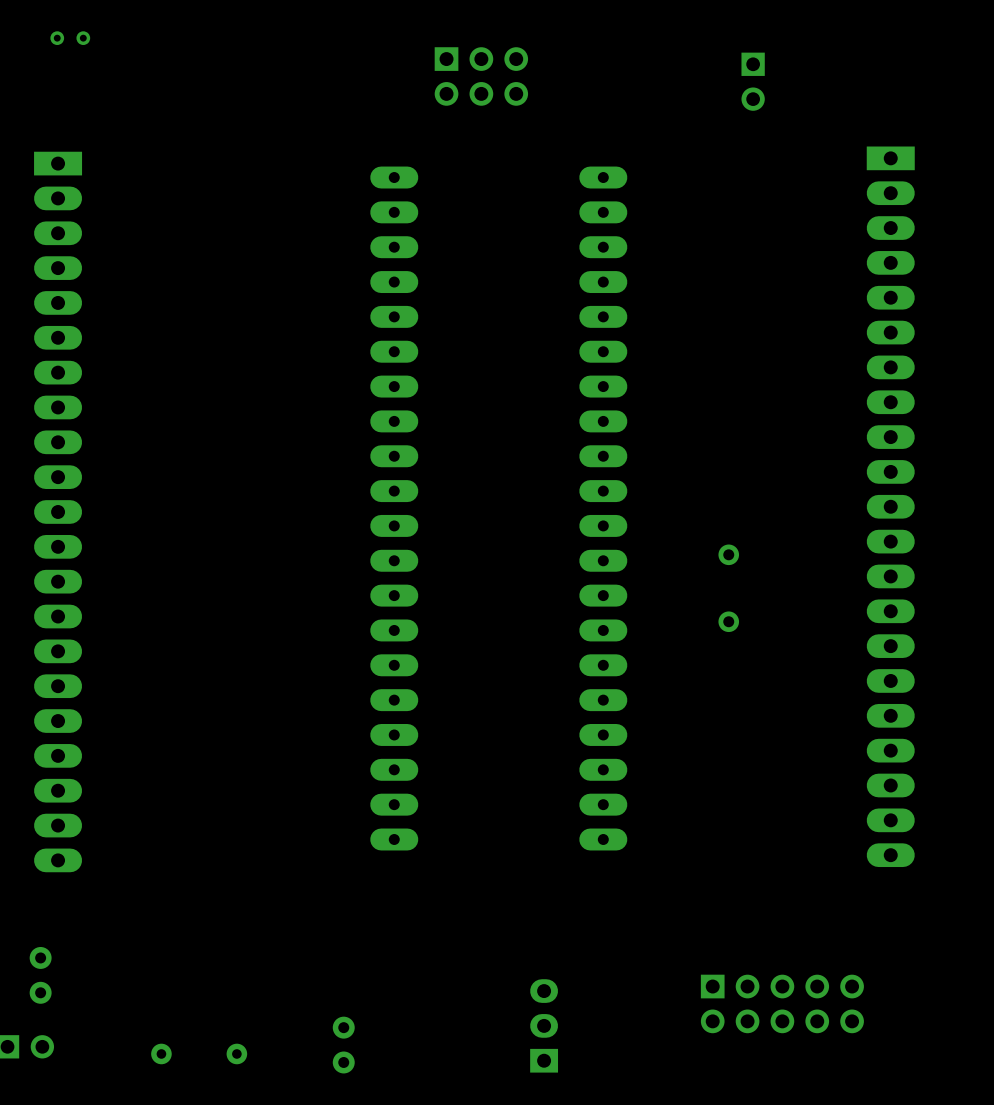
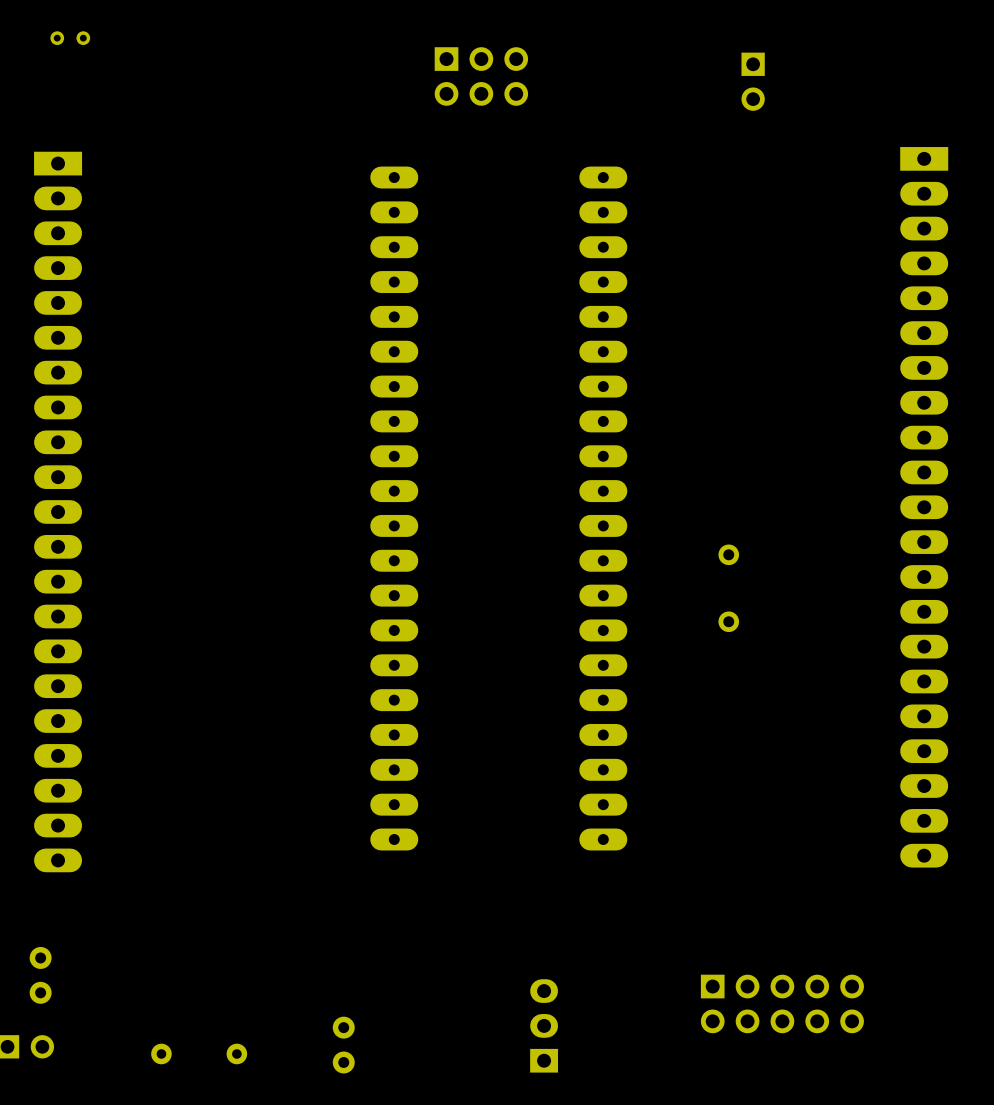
part position: (890, 506) -> (924, 507)

